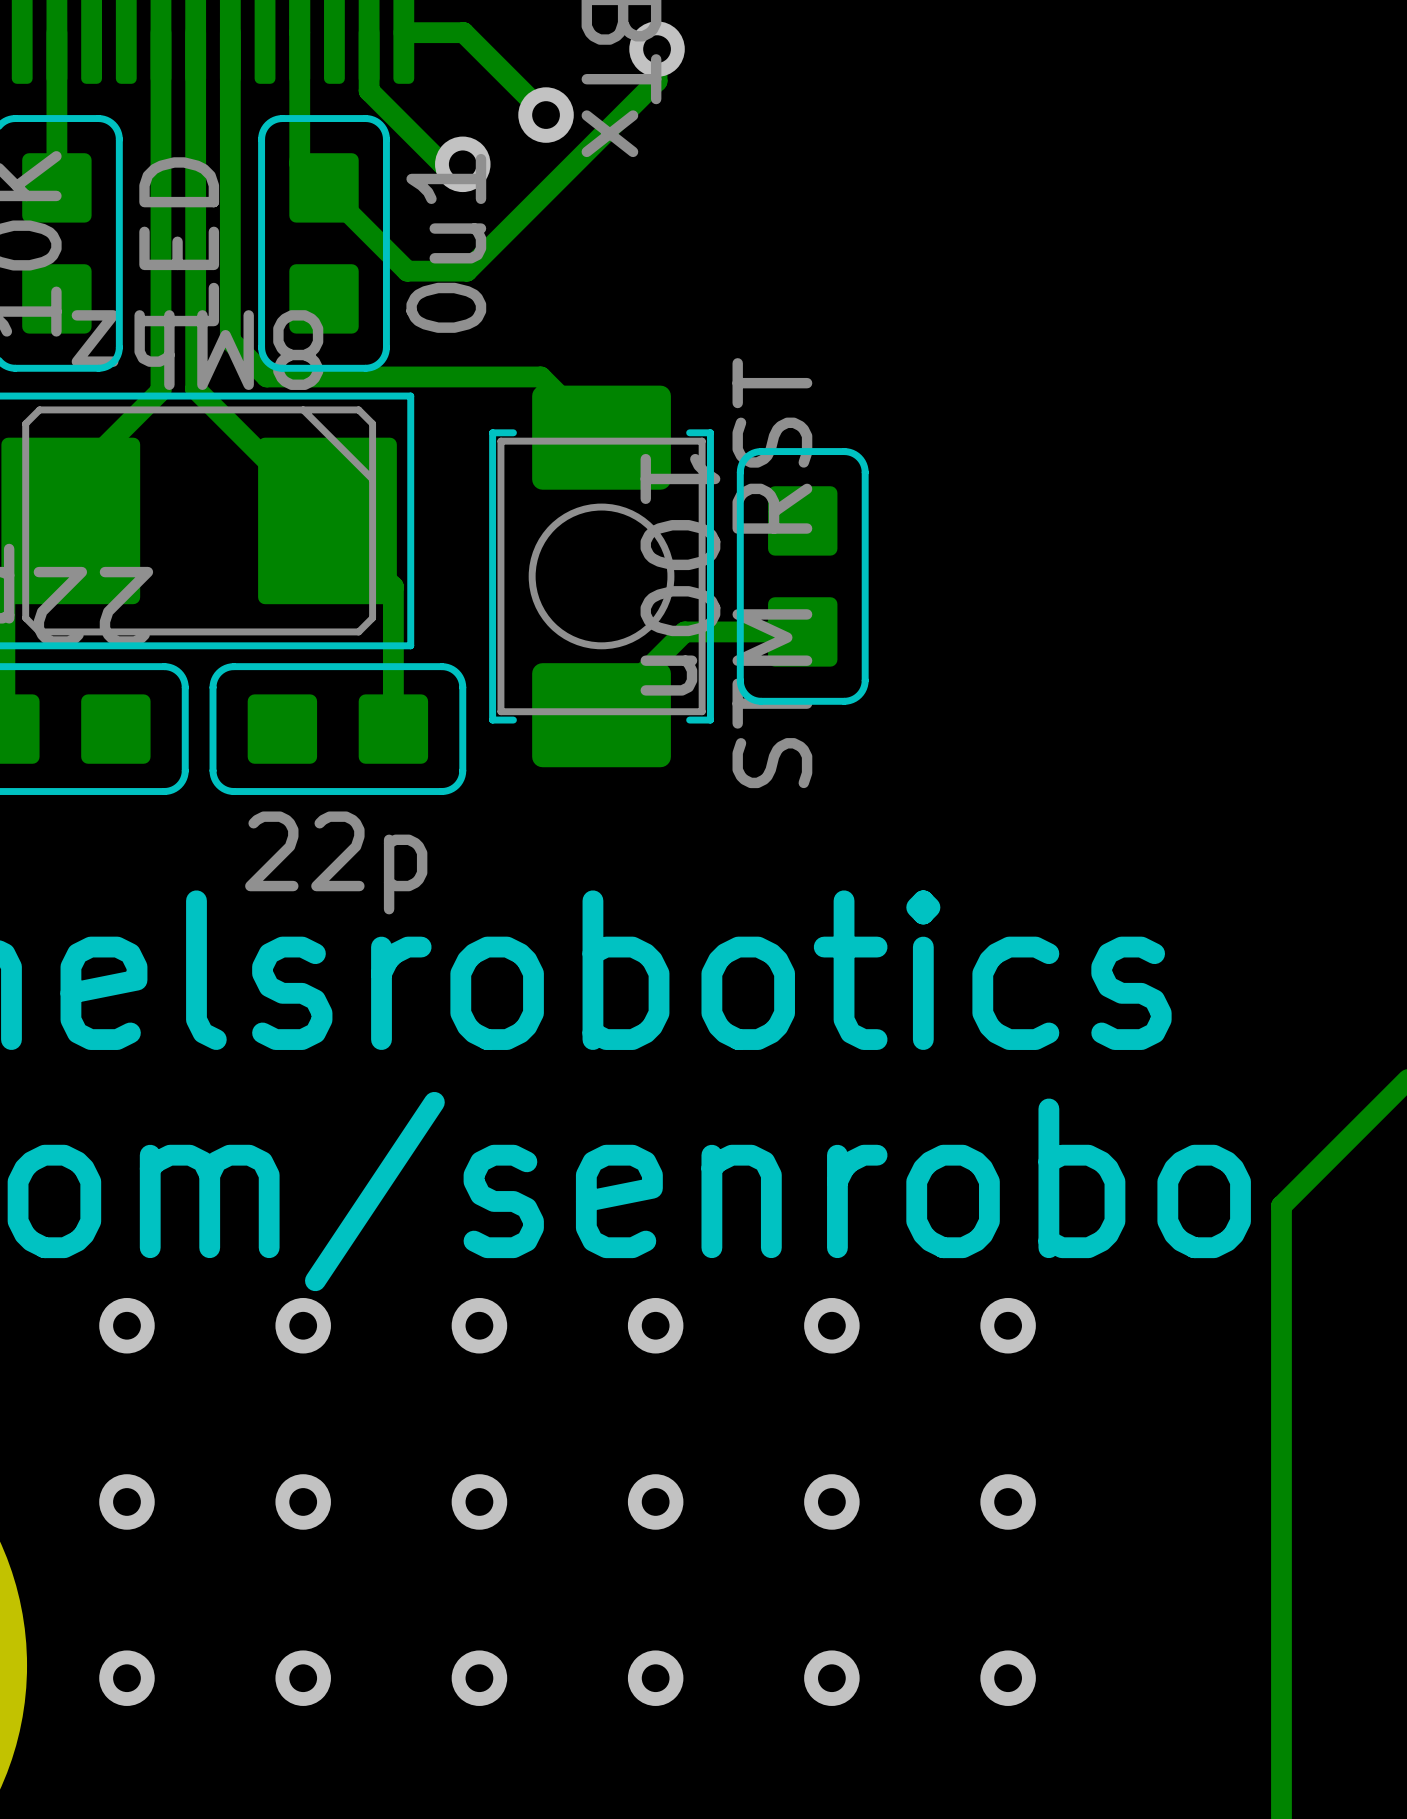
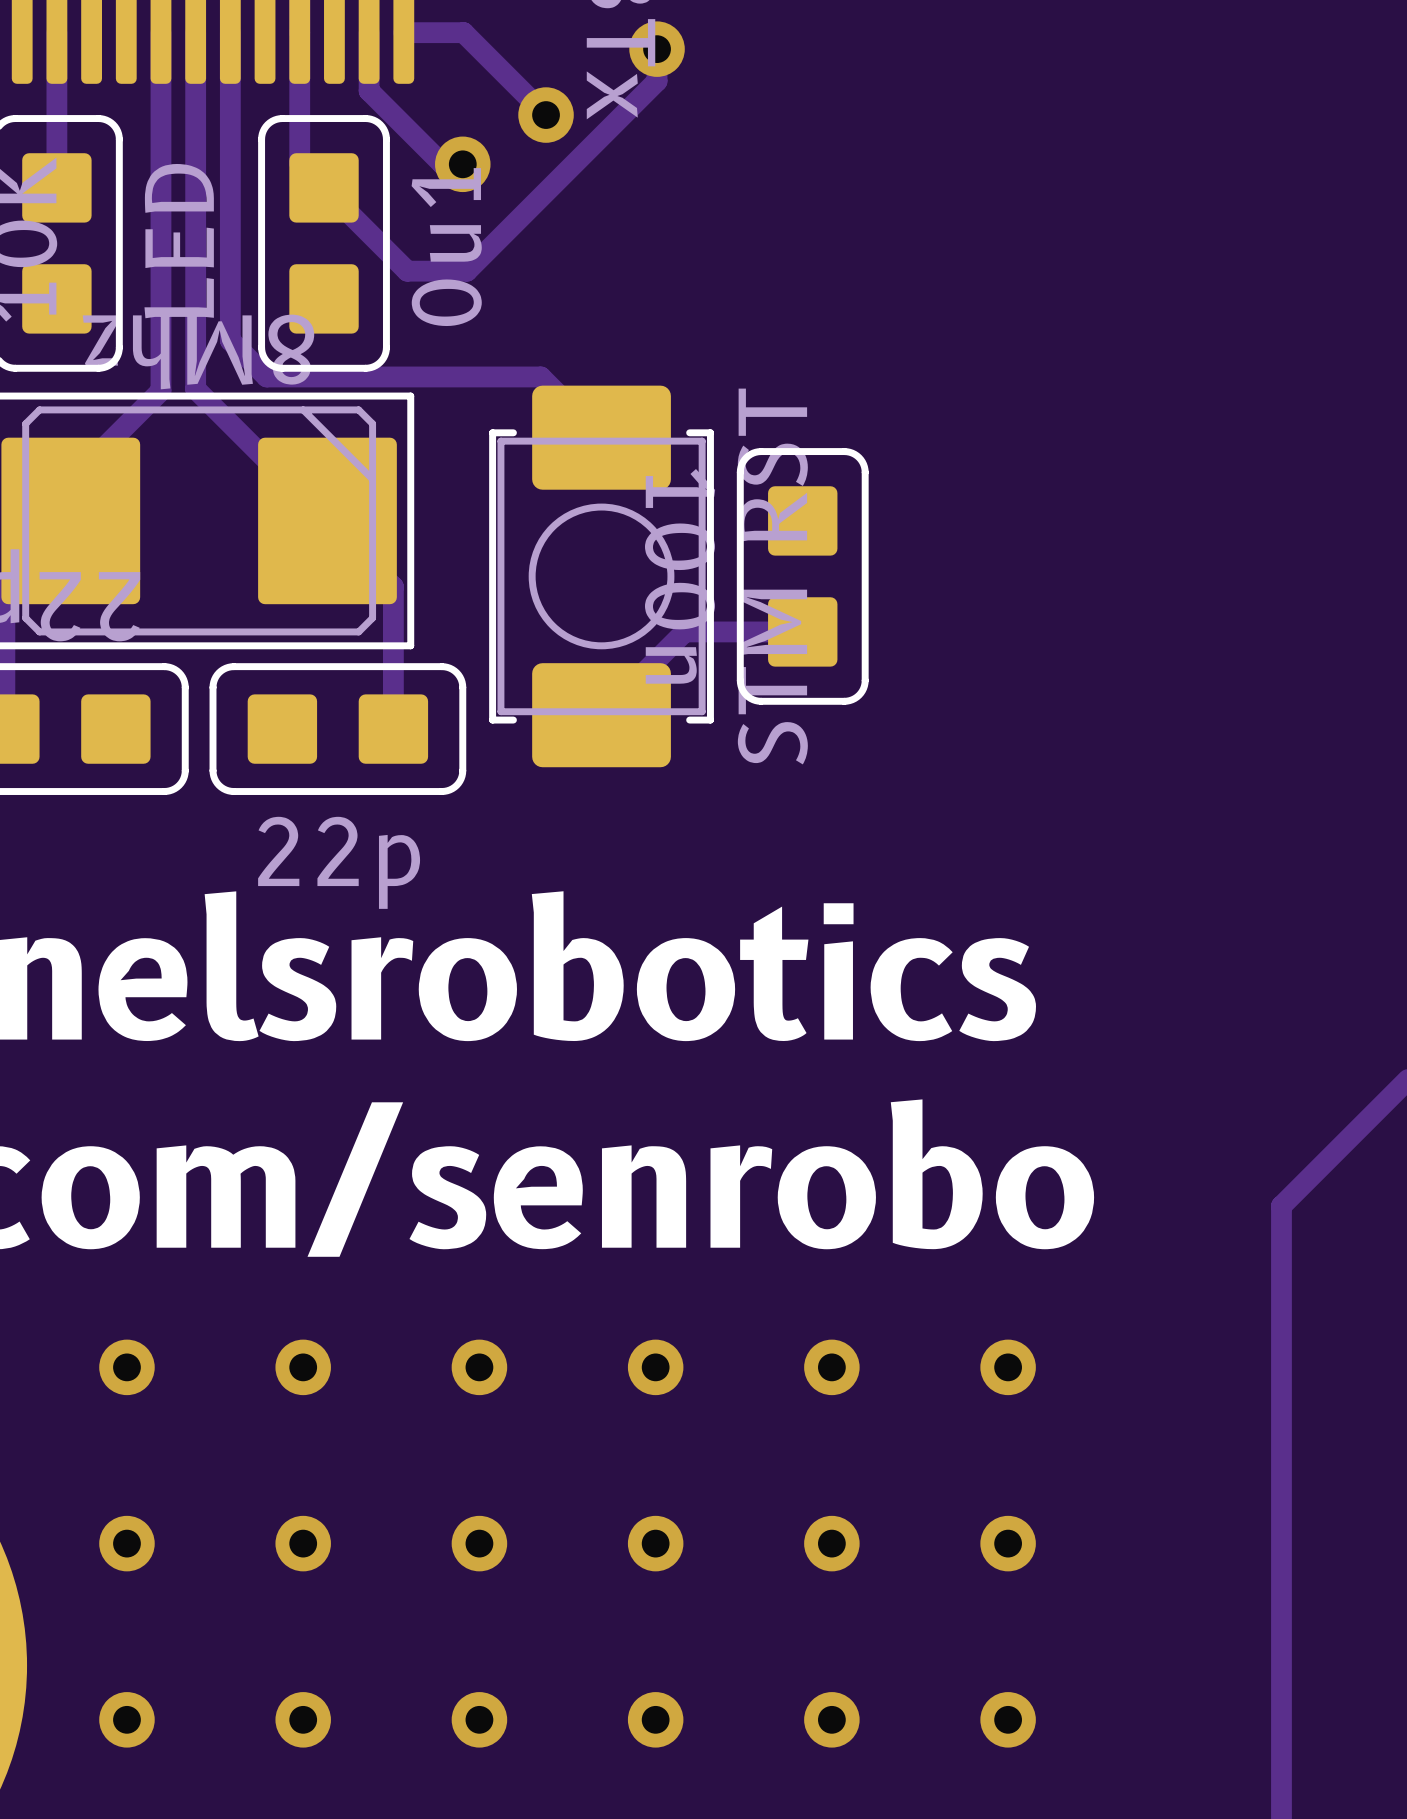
via position: (126, 1325) -> (126, 1367)
via position: (303, 1325) -> (303, 1367)
via position: (479, 1325) -> (479, 1367)
via position: (655, 1325) -> (655, 1367)
via position: (831, 1325) -> (831, 1367)
via position: (1008, 1325) -> (1008, 1367)
via position: (126, 1501) -> (126, 1543)
via position: (303, 1501) -> (303, 1543)
via position: (479, 1501) -> (479, 1543)
via position: (655, 1501) -> (655, 1543)
via position: (831, 1501) -> (831, 1543)
via position: (1008, 1501) -> (1008, 1543)
via position: (126, 1678) -> (126, 1719)
via position: (303, 1678) -> (303, 1719)
via position: (479, 1678) -> (479, 1719)
via position: (655, 1678) -> (655, 1719)
via position: (831, 1678) -> (831, 1719)
via position: (1008, 1678) -> (1008, 1719)

